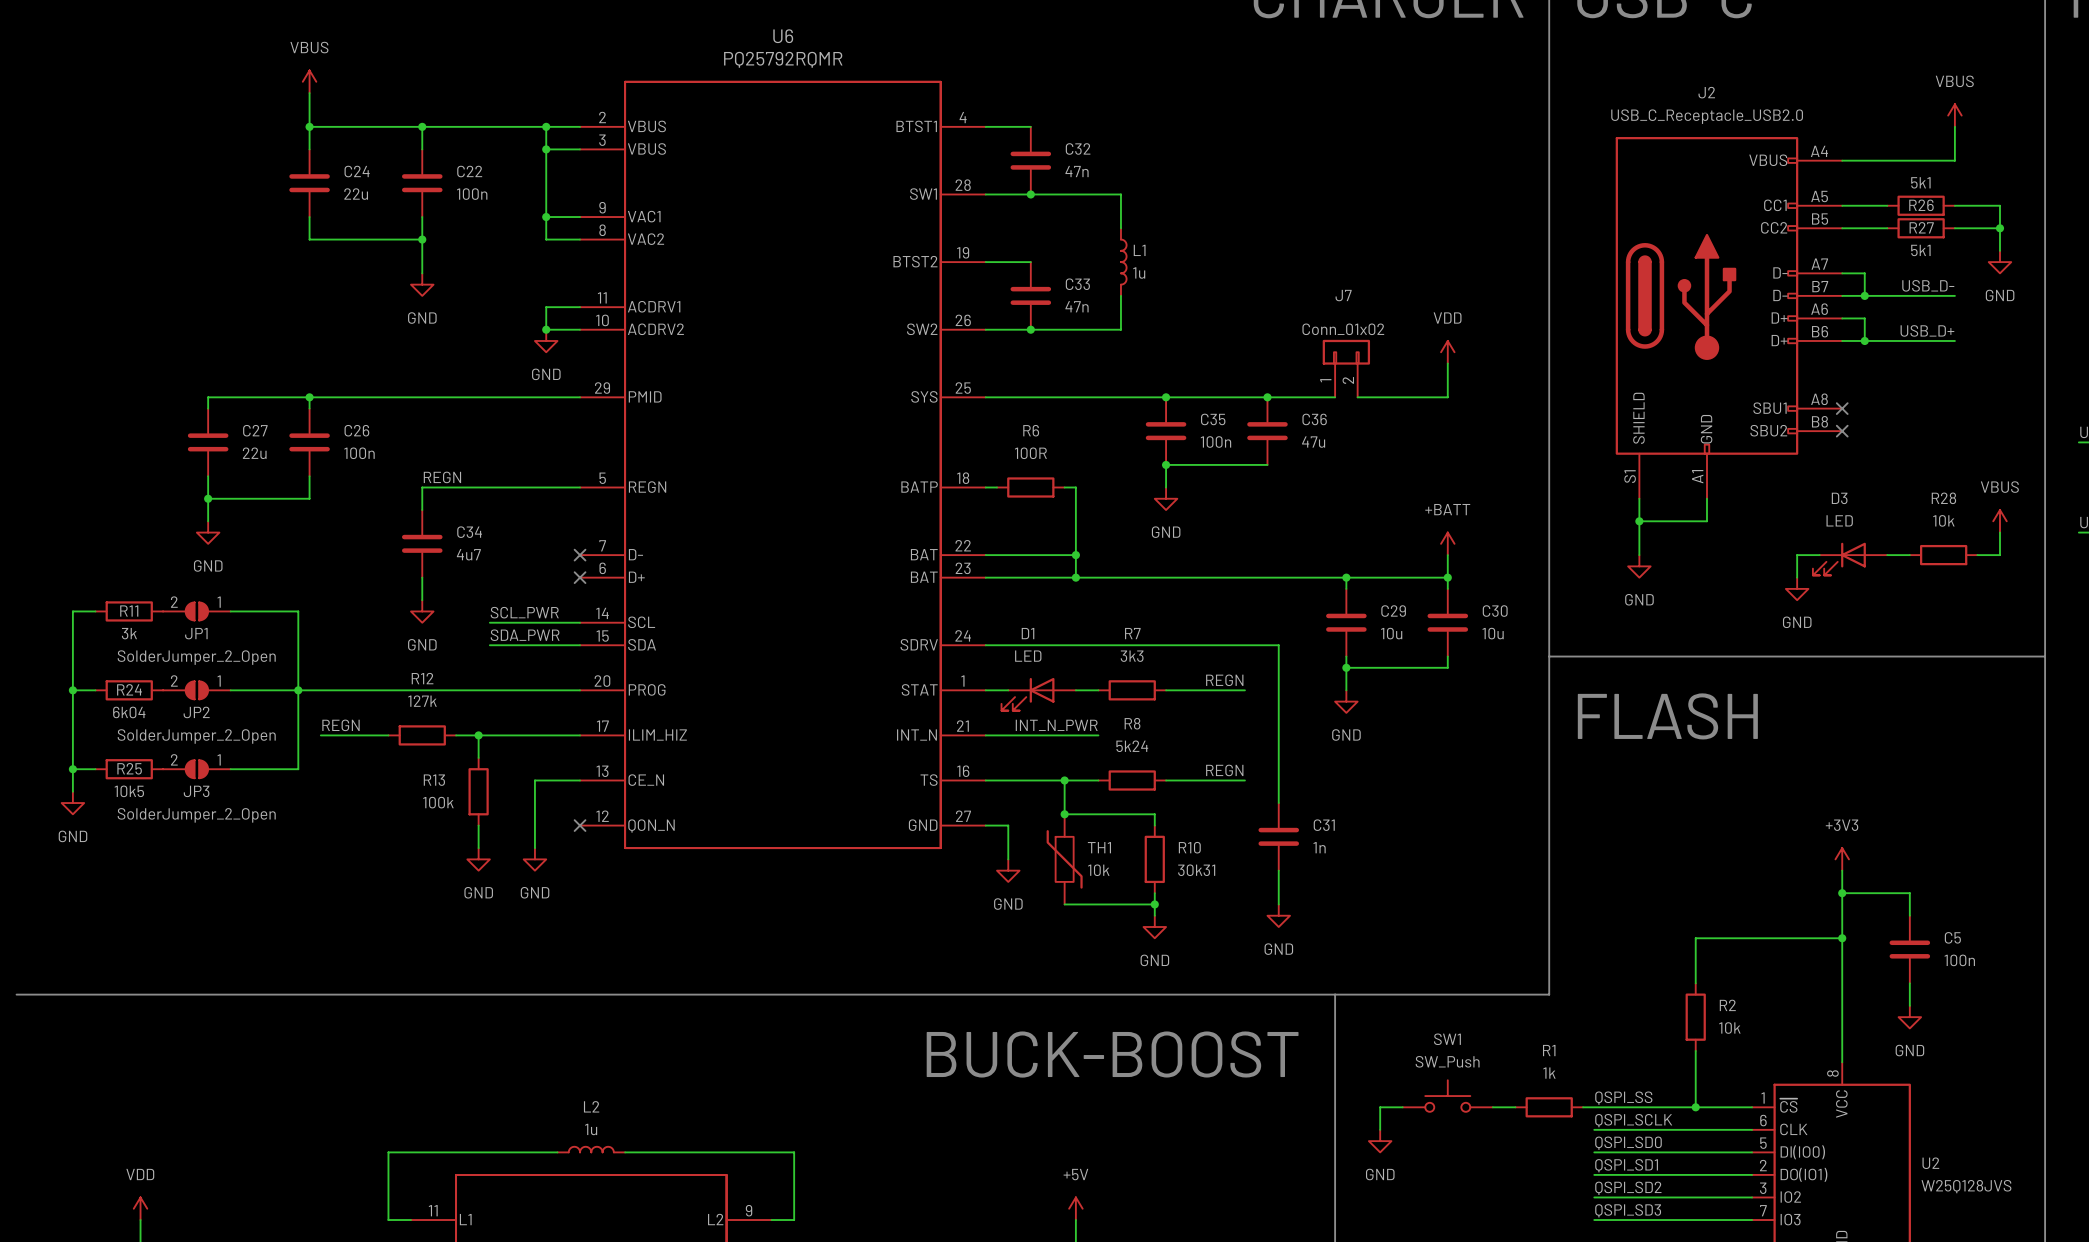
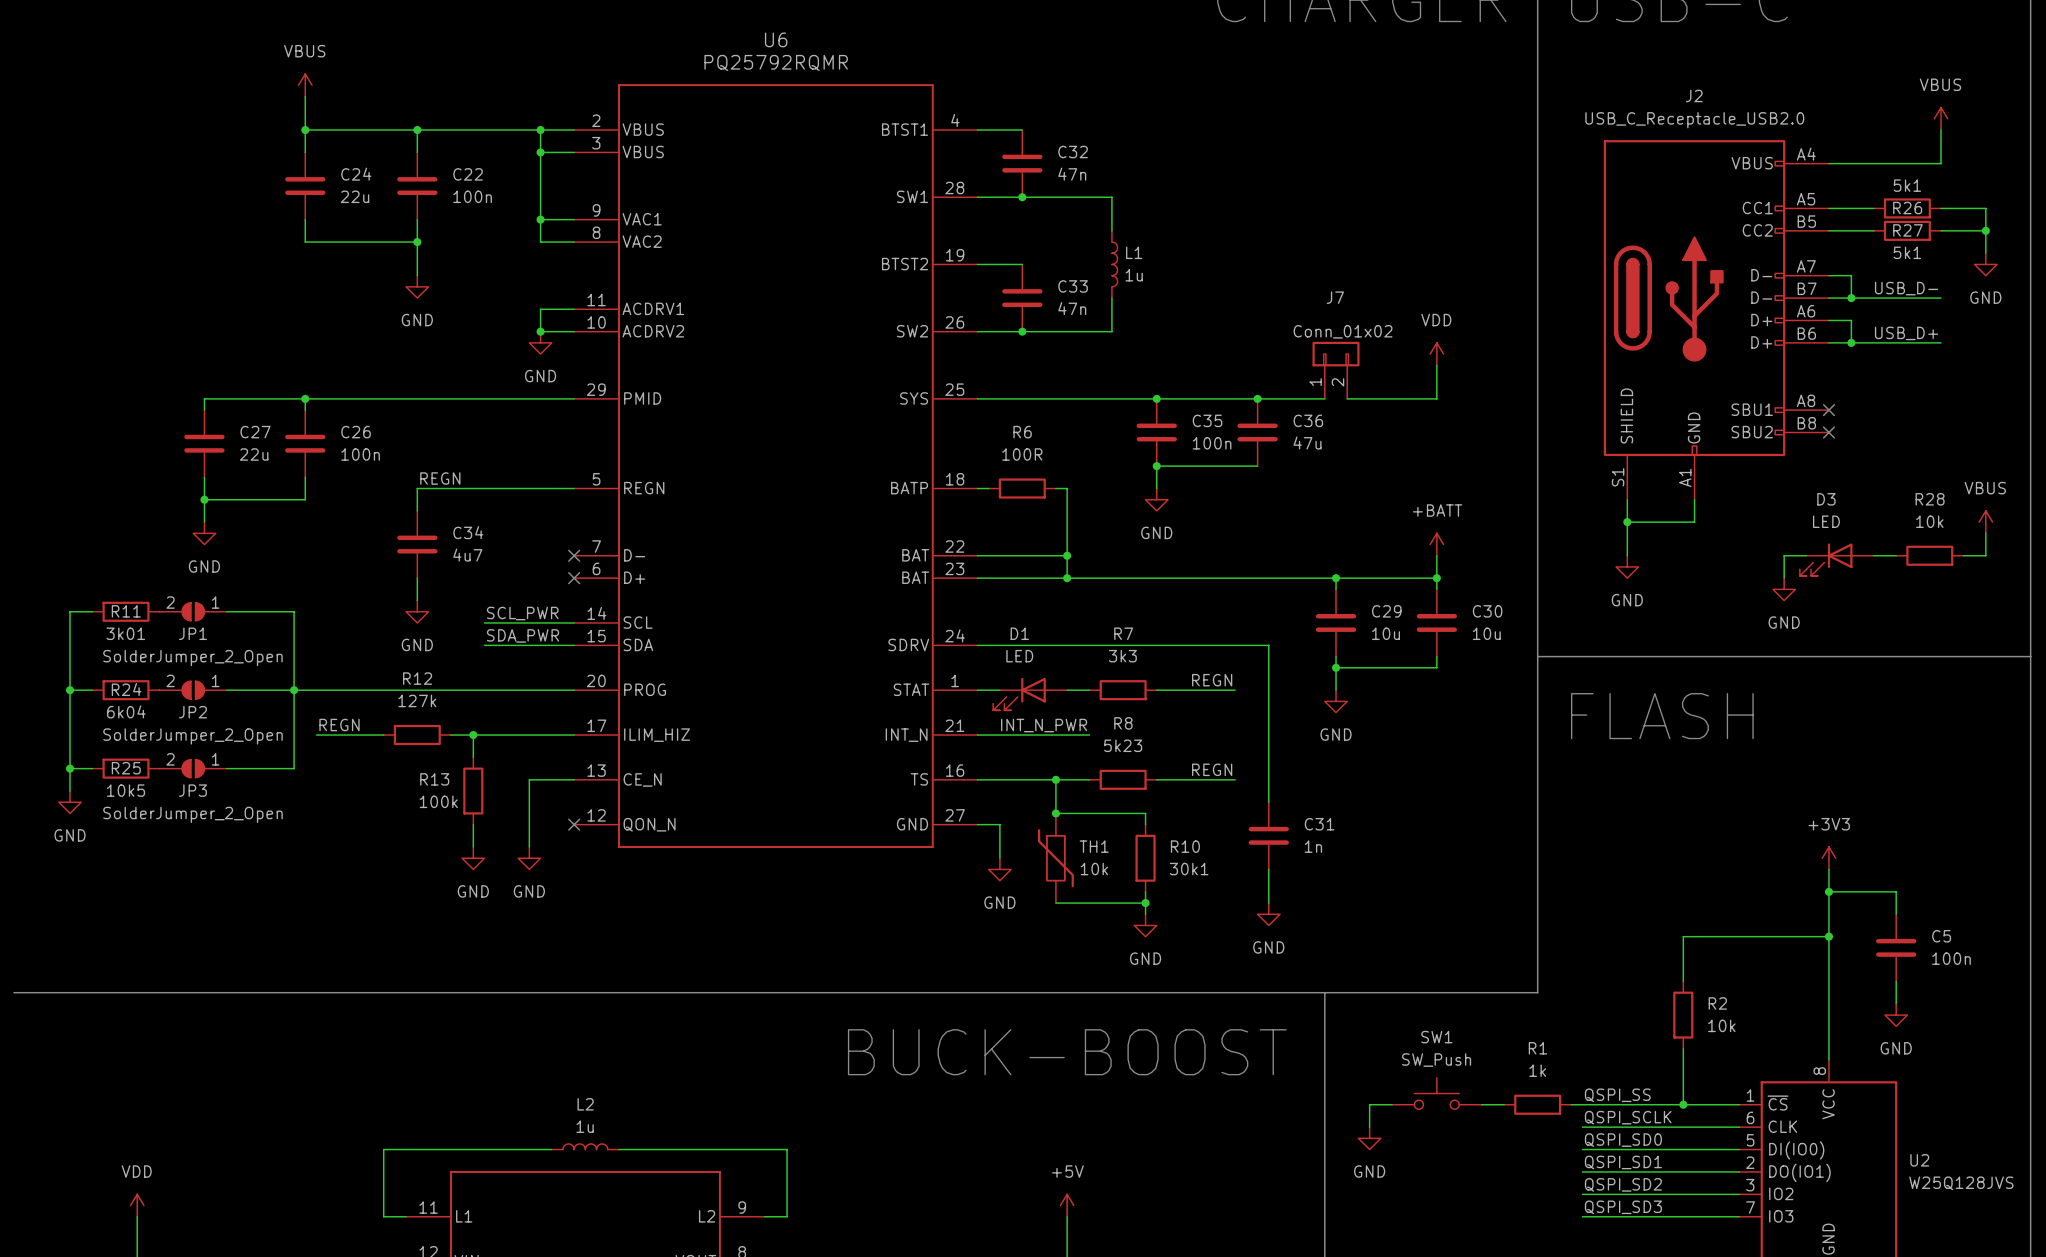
R11 value: 3k (129, 633) -> 3k01 (125, 633)
R8 value: 5k24 (1132, 746) -> 5k23 (1123, 745)
R10 value: 30k31 (1196, 870) -> 30k1 (1189, 869)

